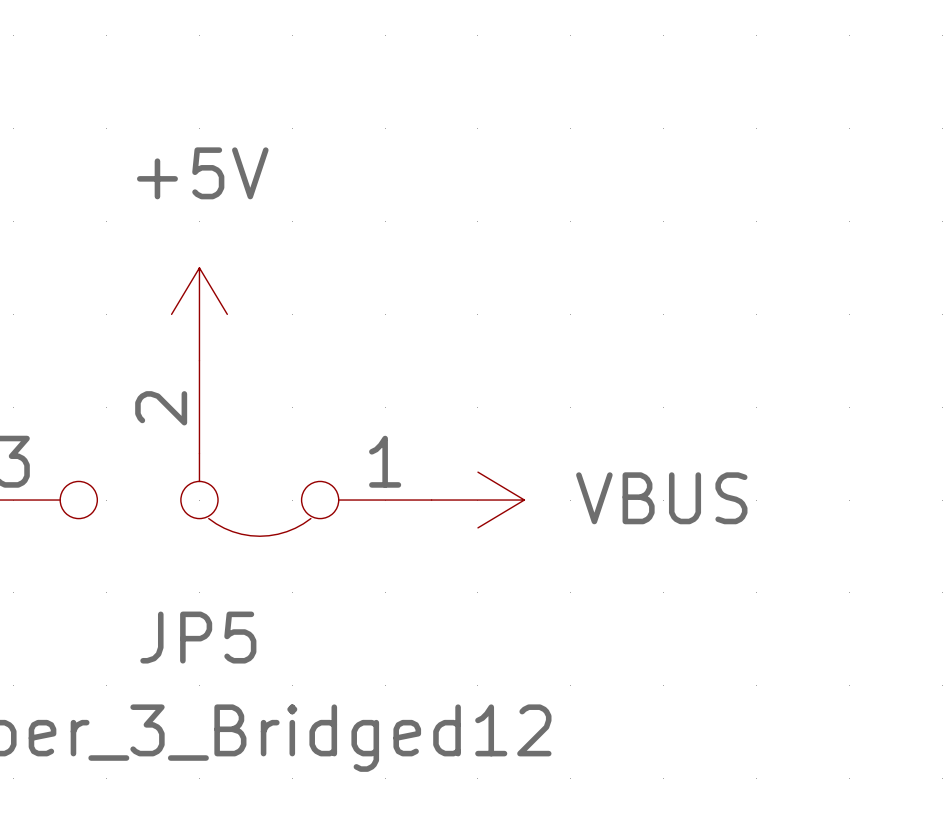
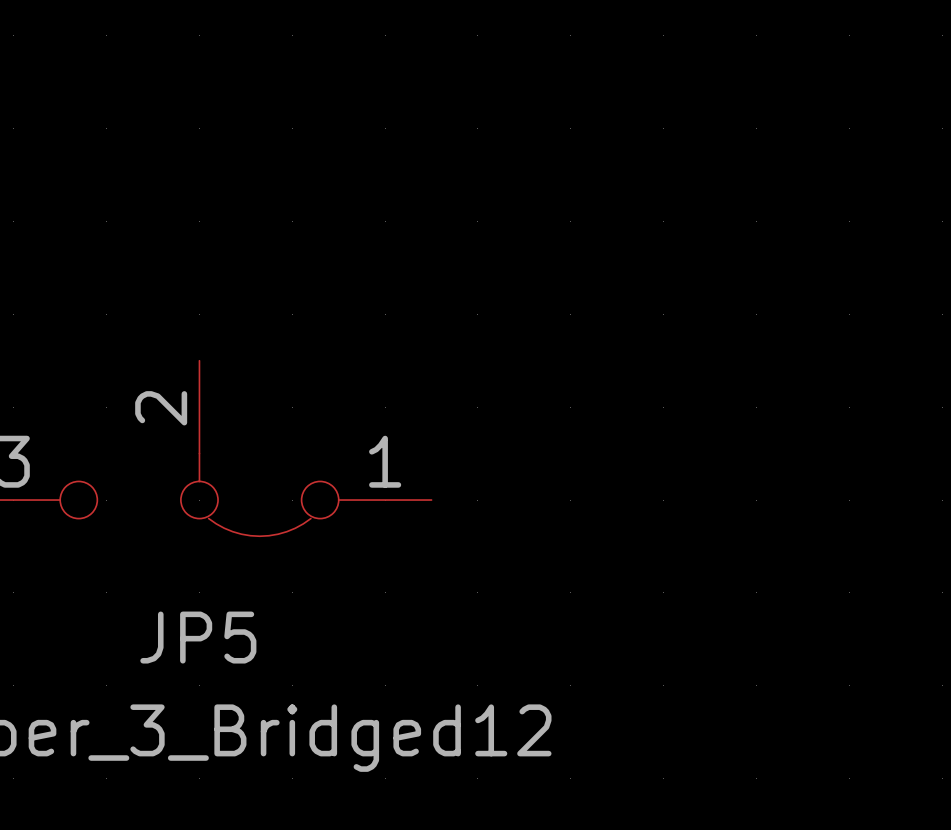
power symbol: +5V (199, 314) -> none
power symbol: VBUS (477, 500) -> none

